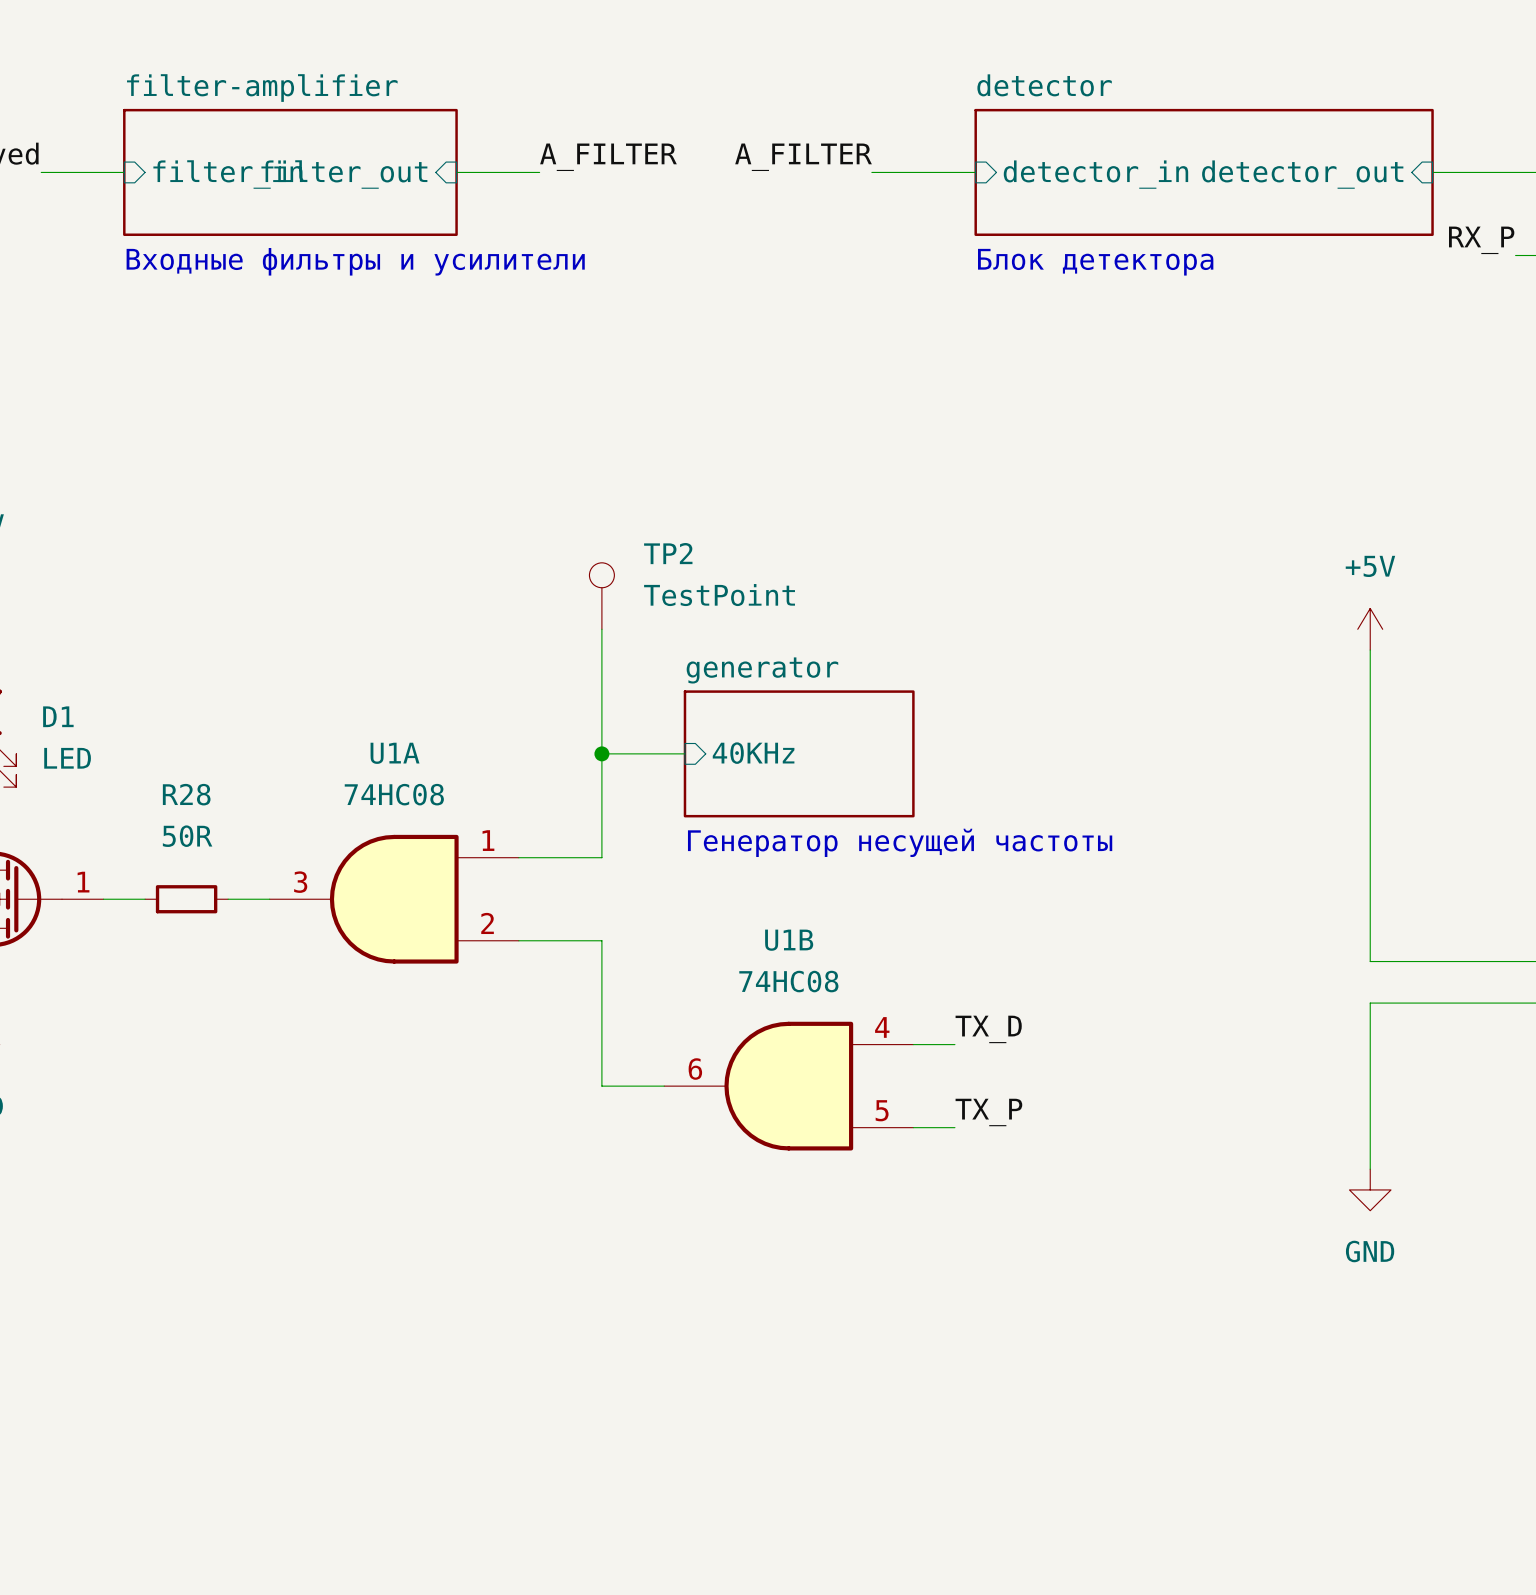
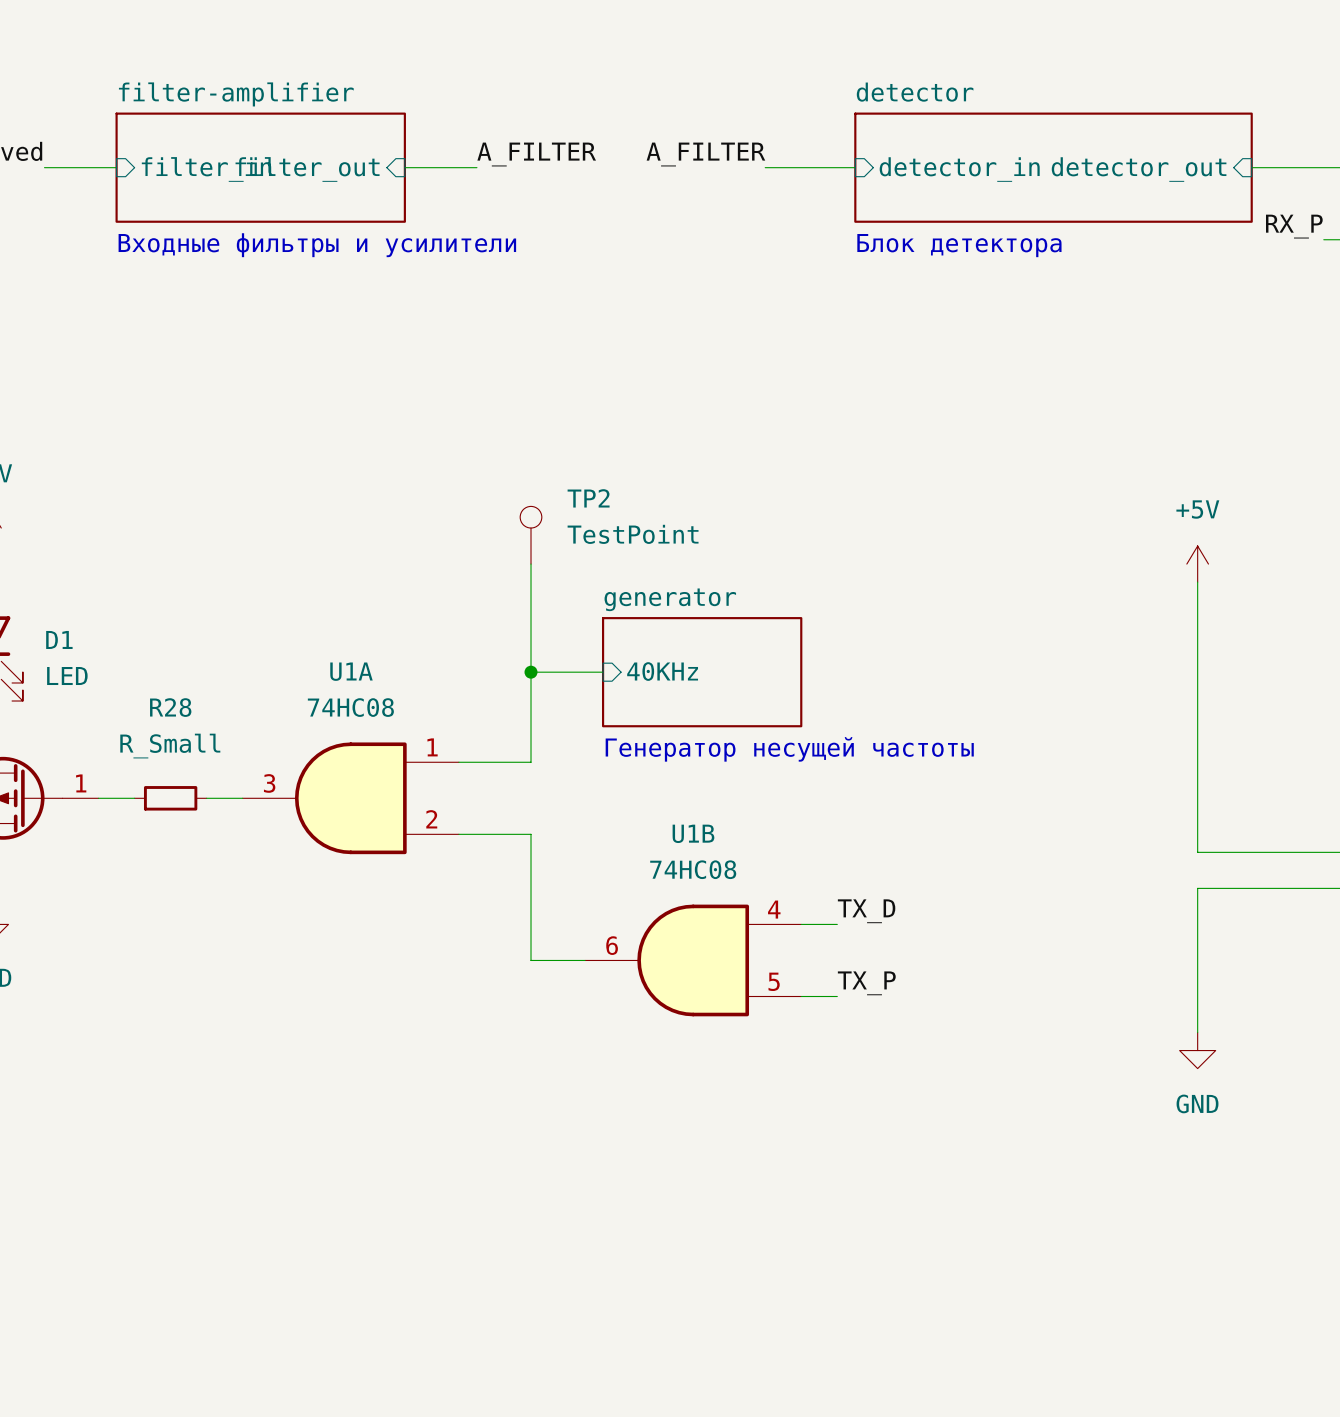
R28 value: 50R (187, 836) -> R_Small (170, 746)

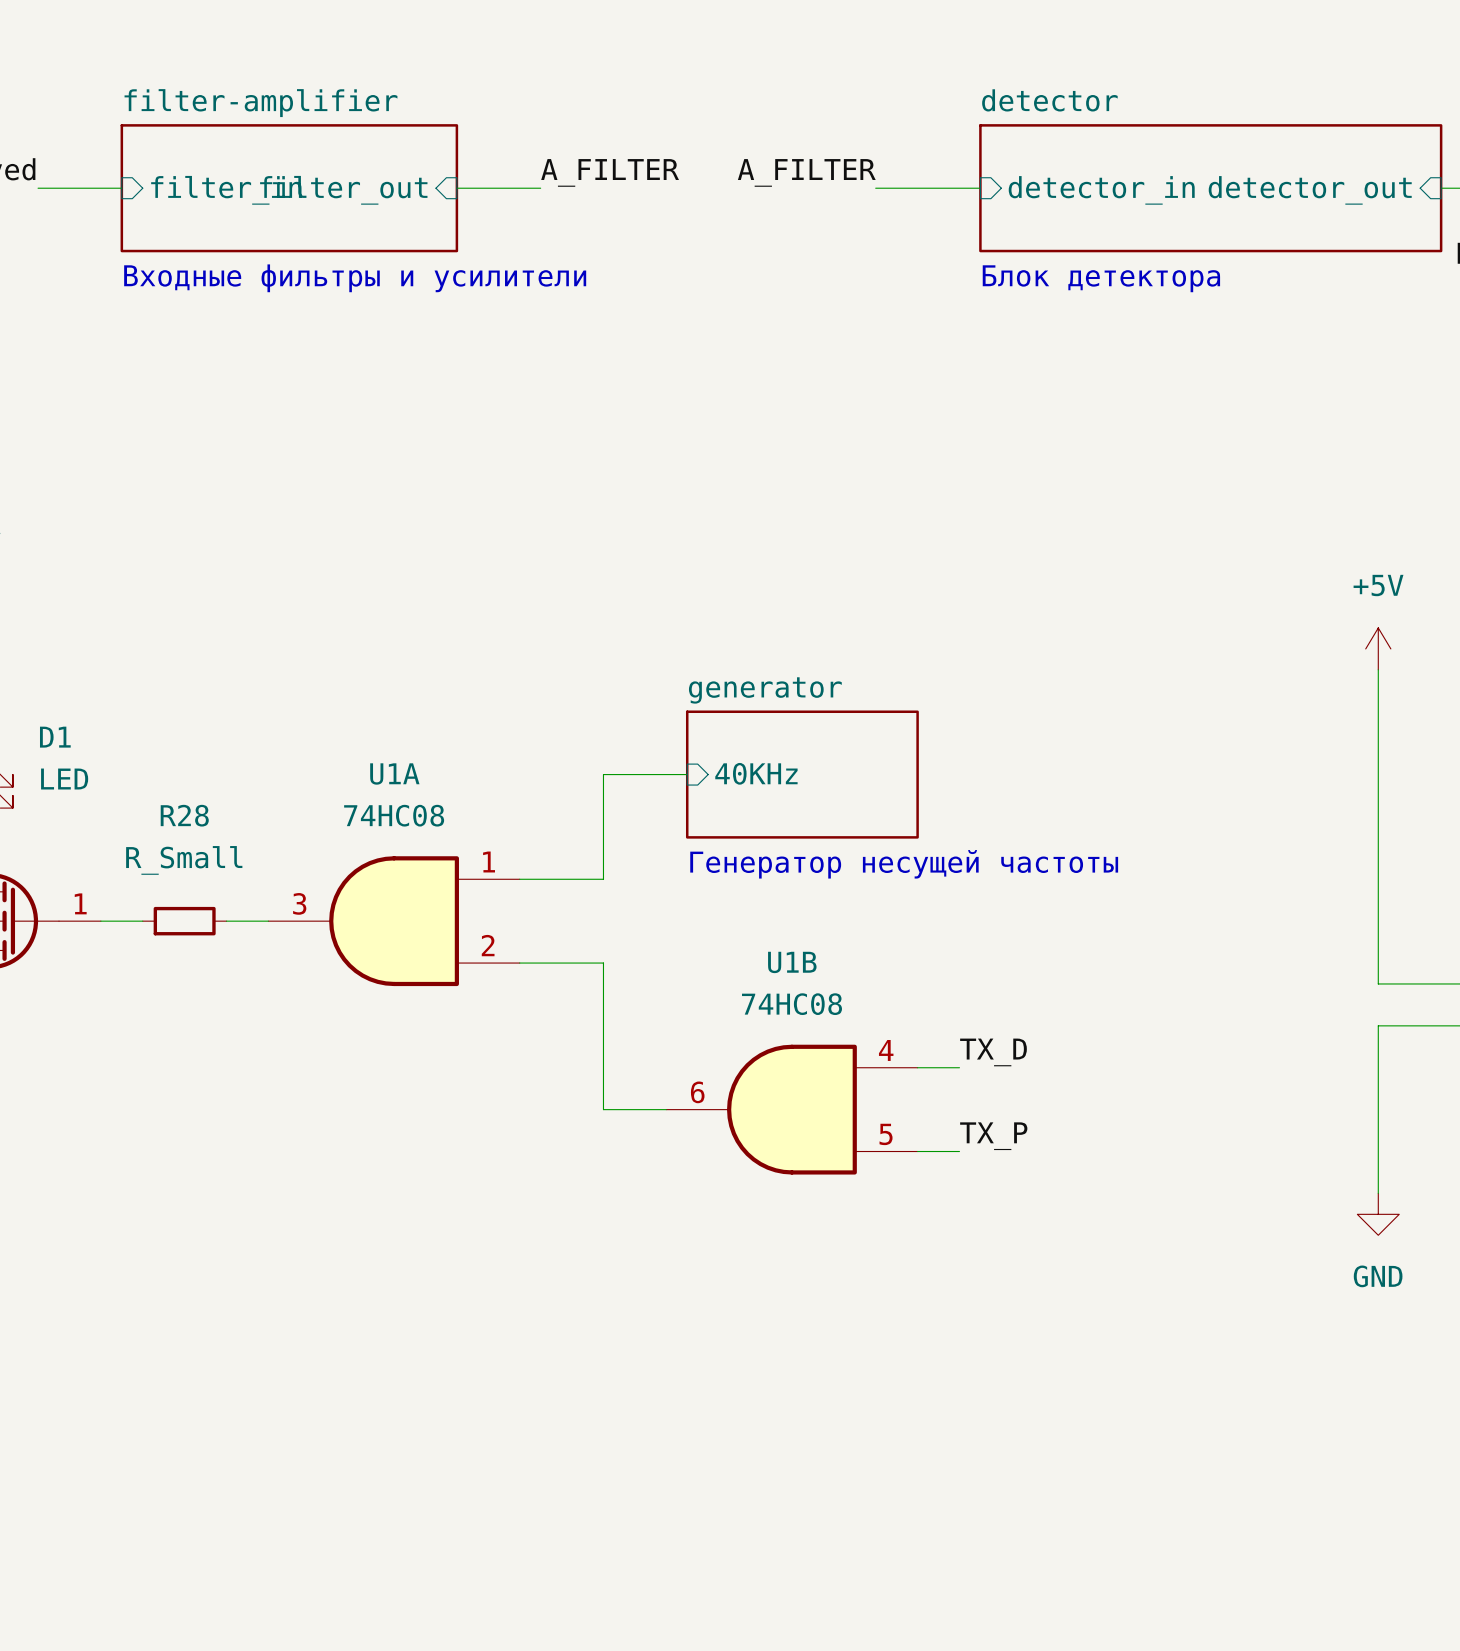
TP2: TestPoint (531, 535) -> none
wire: (531, 564) (531, 672) -> none
junction: (531, 672) -> none

